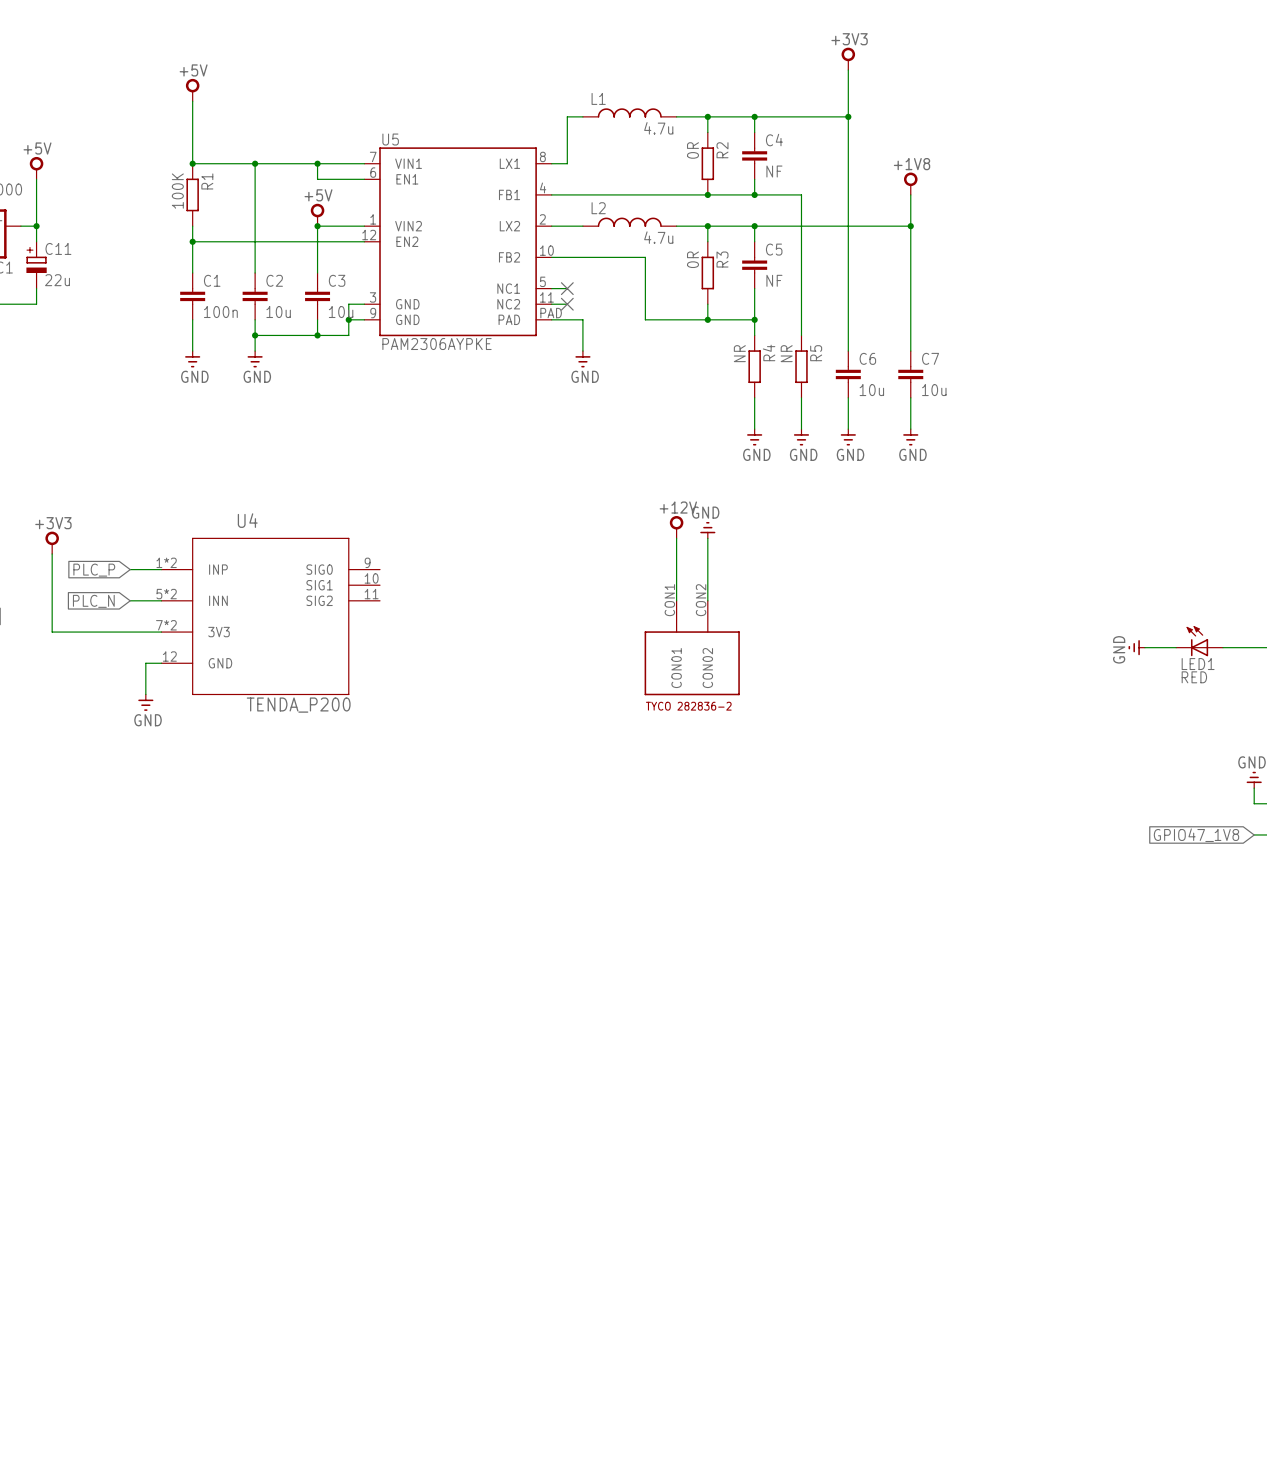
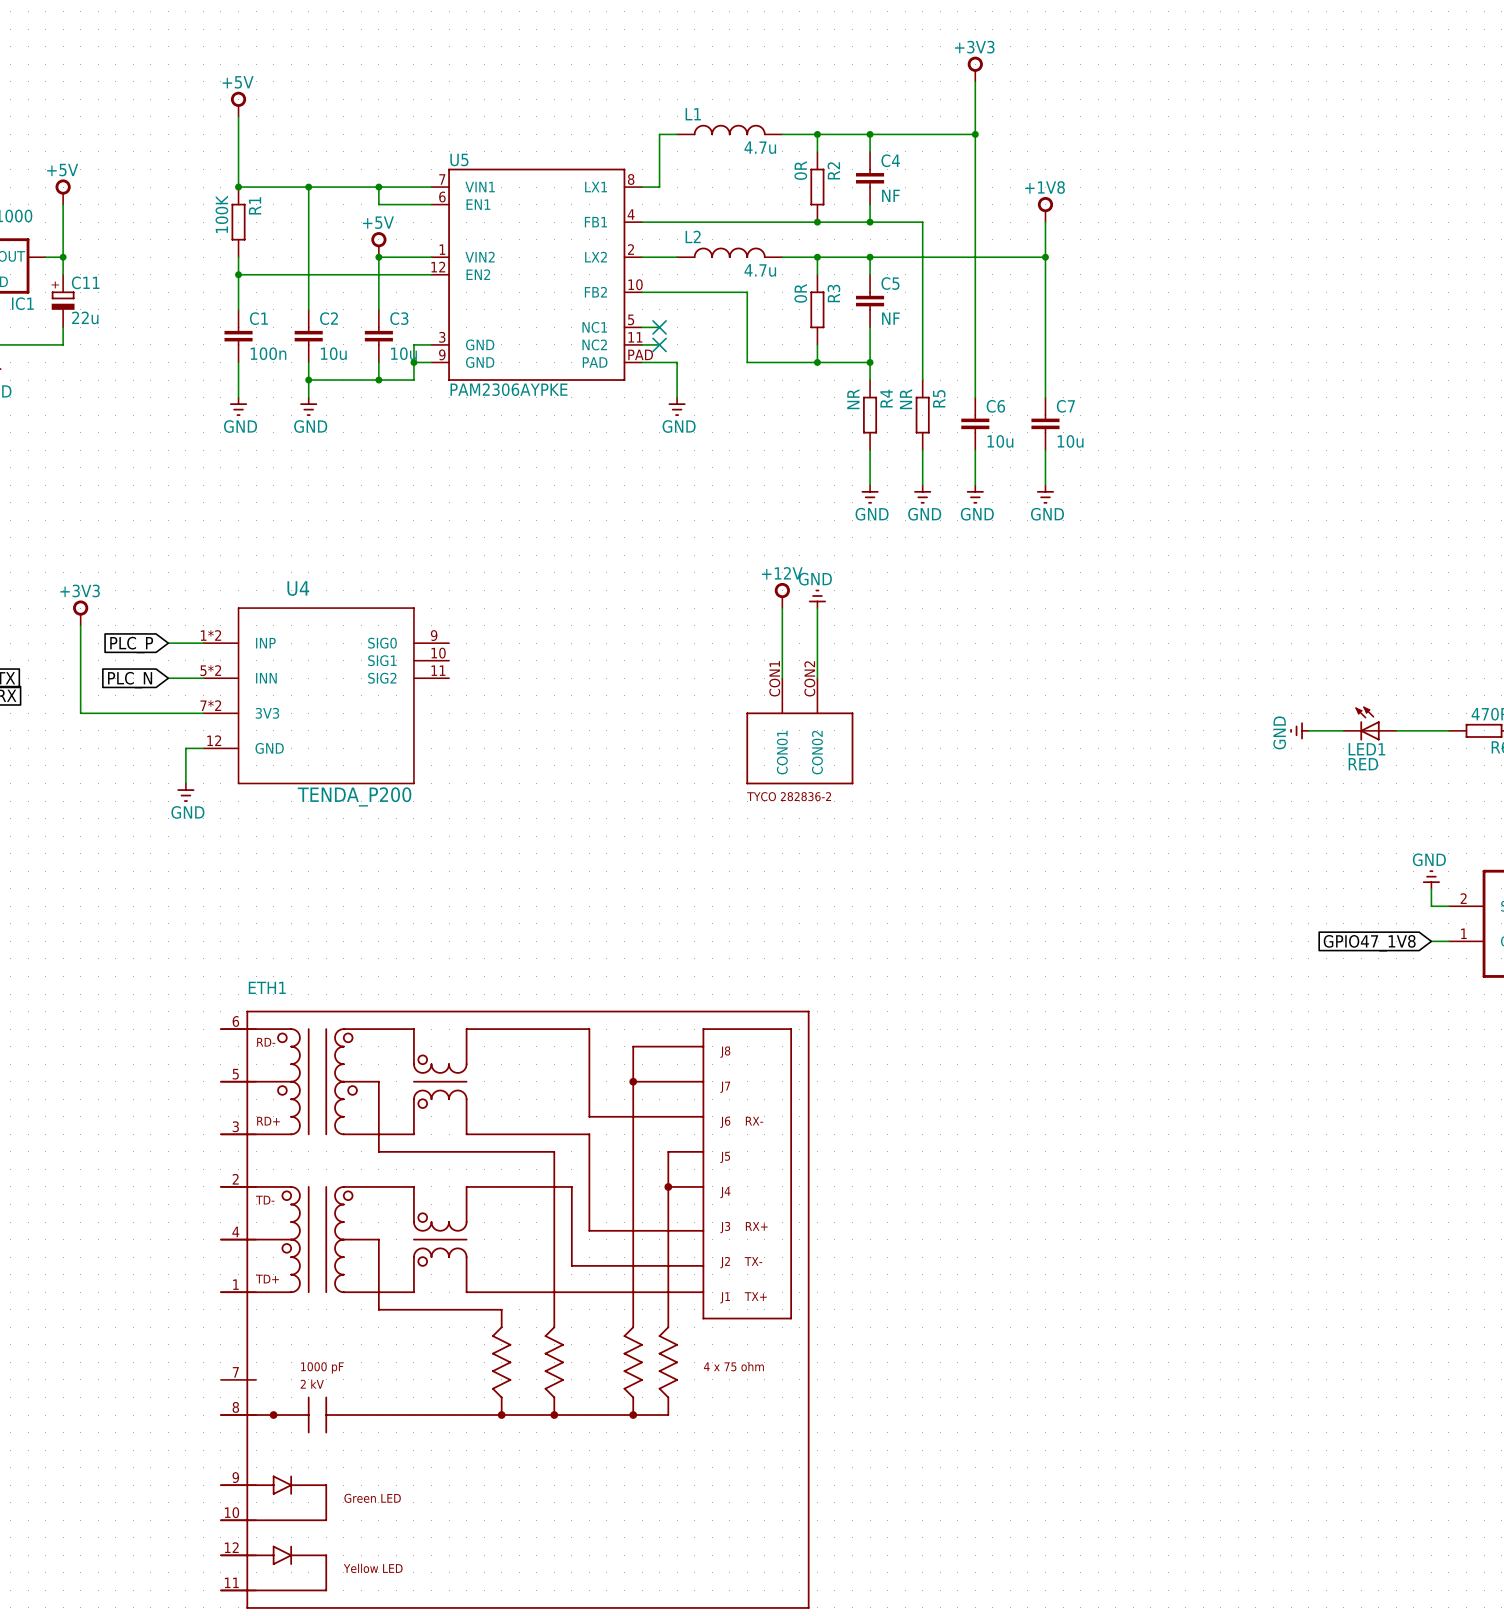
ETH1: none -> (514, 1309)

